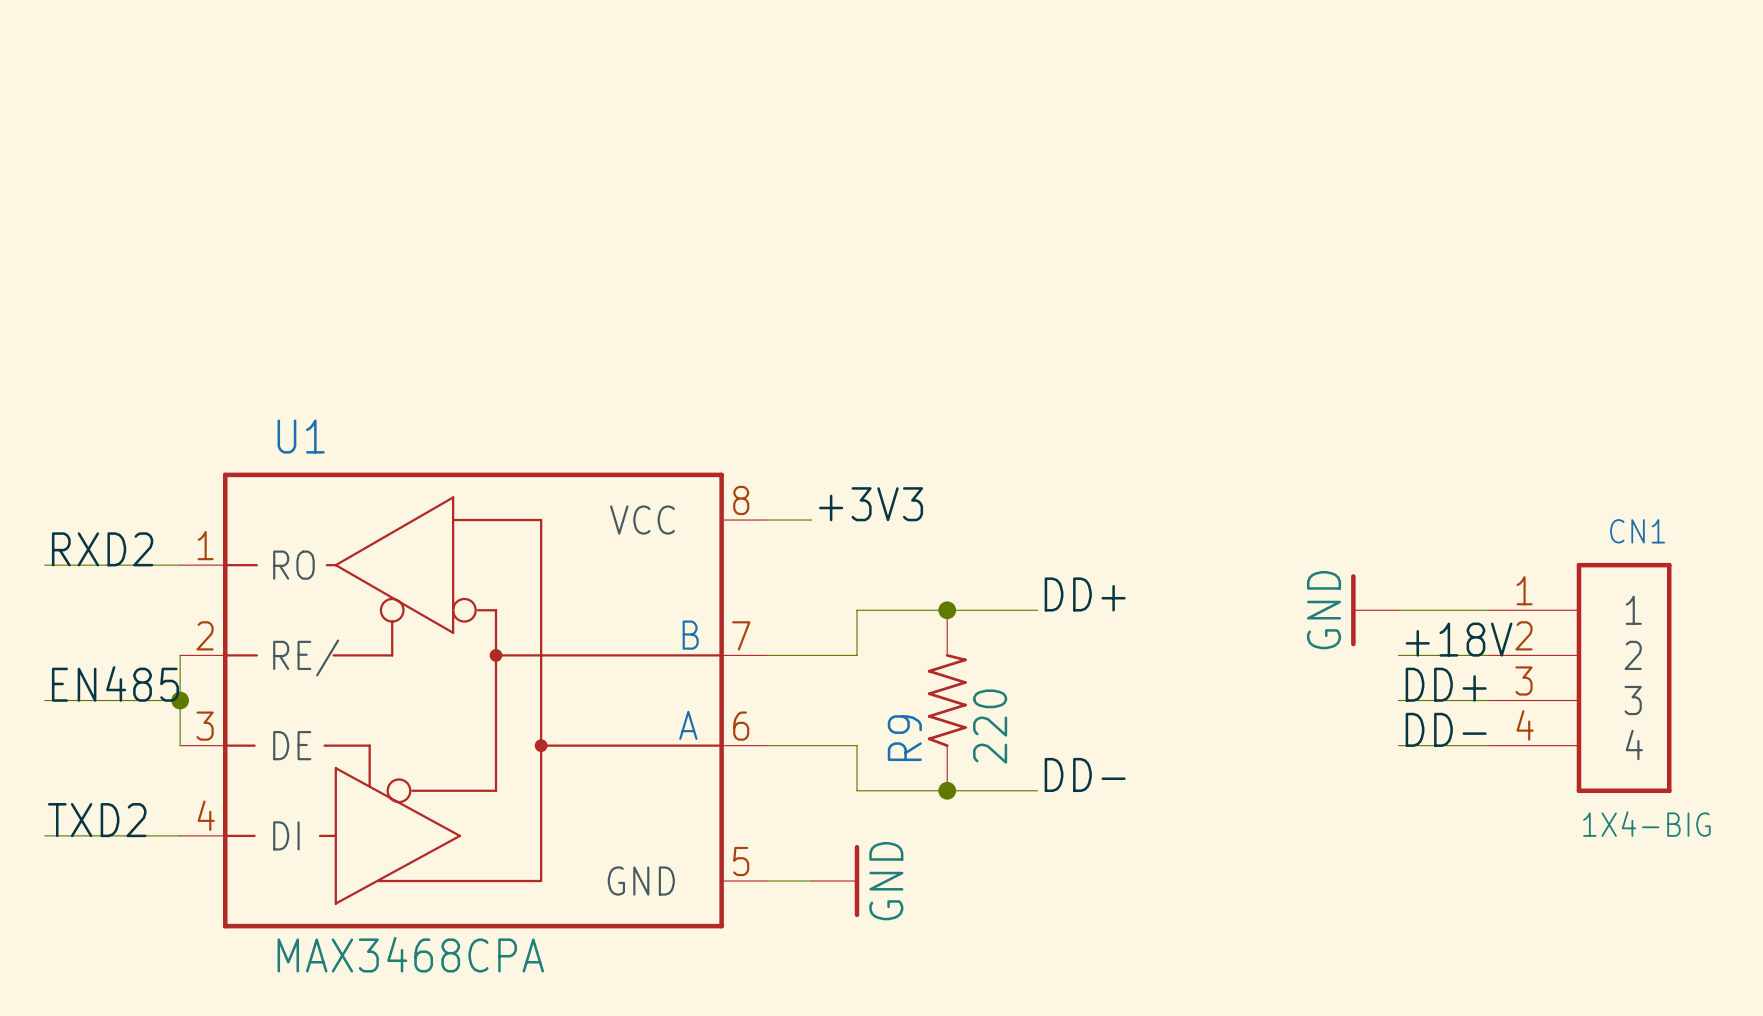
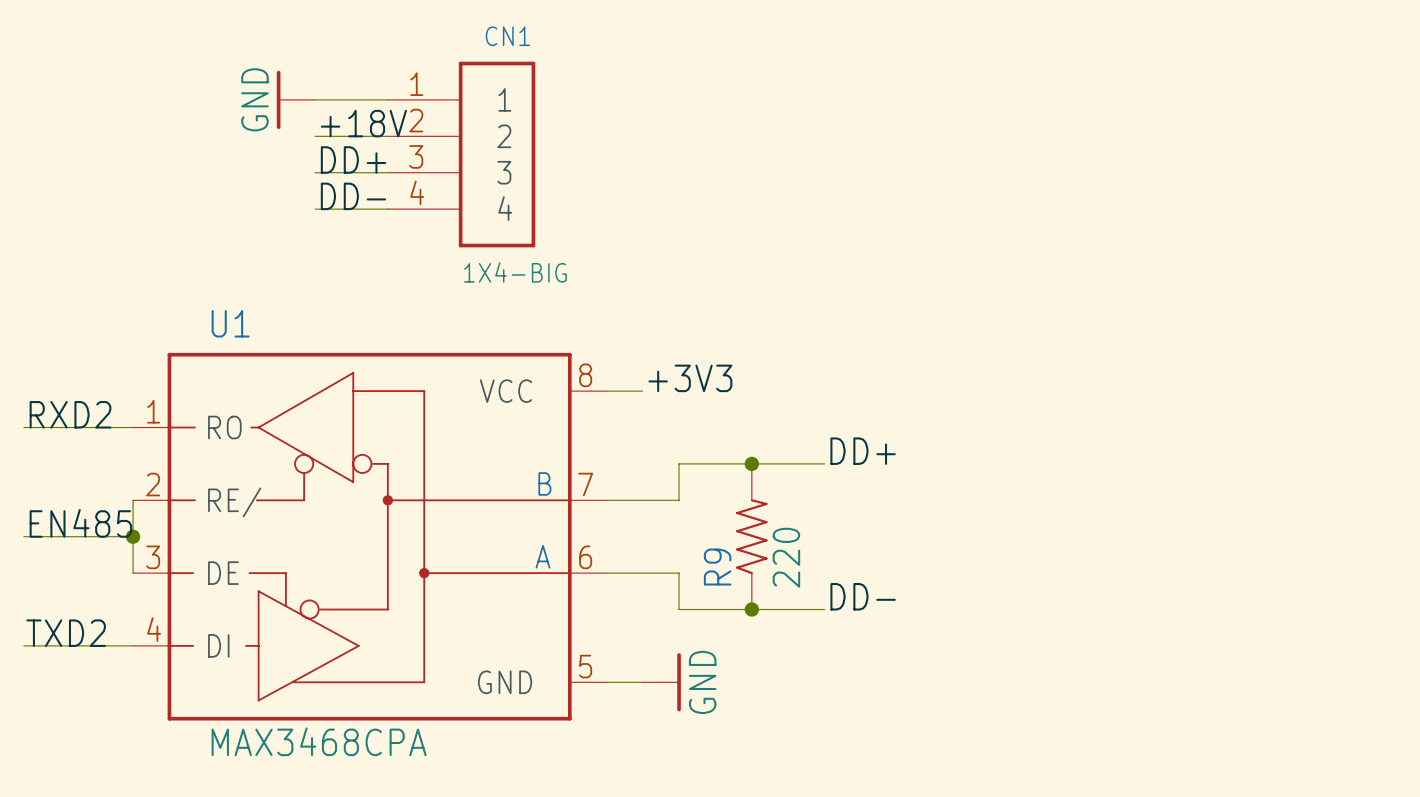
power symbol: none -> GND (295, 99)
wire: none -> (315, 99) (387, 99)
label: none -> +18V (363, 123)
wire: none -> (315, 136) (387, 136)
label: none -> DD+ (353, 159)
wire: none -> (315, 172) (387, 172)
label: none -> DD- (353, 196)
wire: none -> (315, 209) (387, 209)
power symbol: GND (1374, 610) -> none
wire: (1398, 610) (1488, 610) -> none
label: +18V (1459, 639) -> none
wire: (1398, 655) (1488, 655) -> none
CN1 position: (1580, 677) -> (461, 154)
label: DD+ (1446, 684) -> none
wire: (1398, 700) (1488, 700) -> none
label: DD- (1446, 729) -> none
wire: (1398, 745) (1488, 745) -> none

